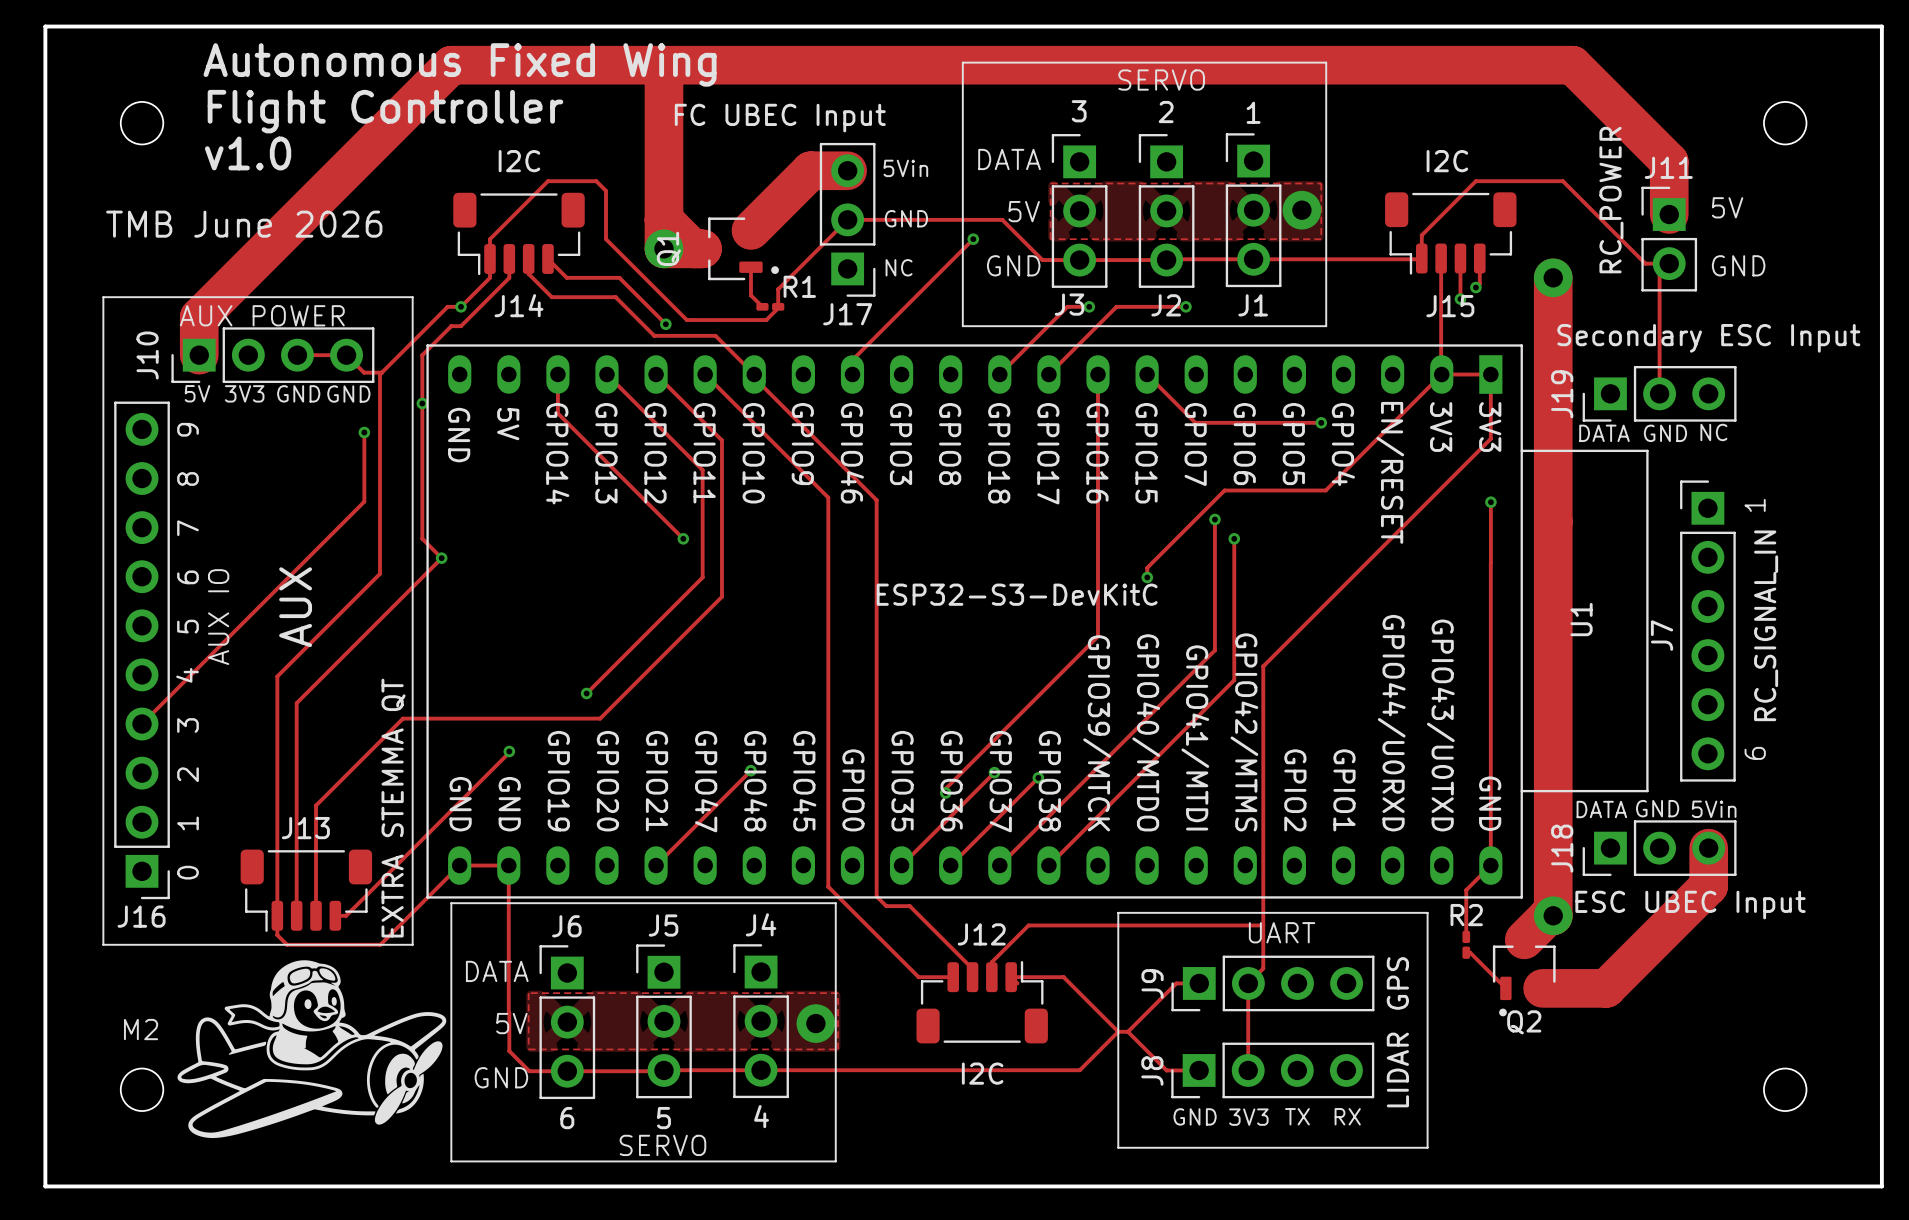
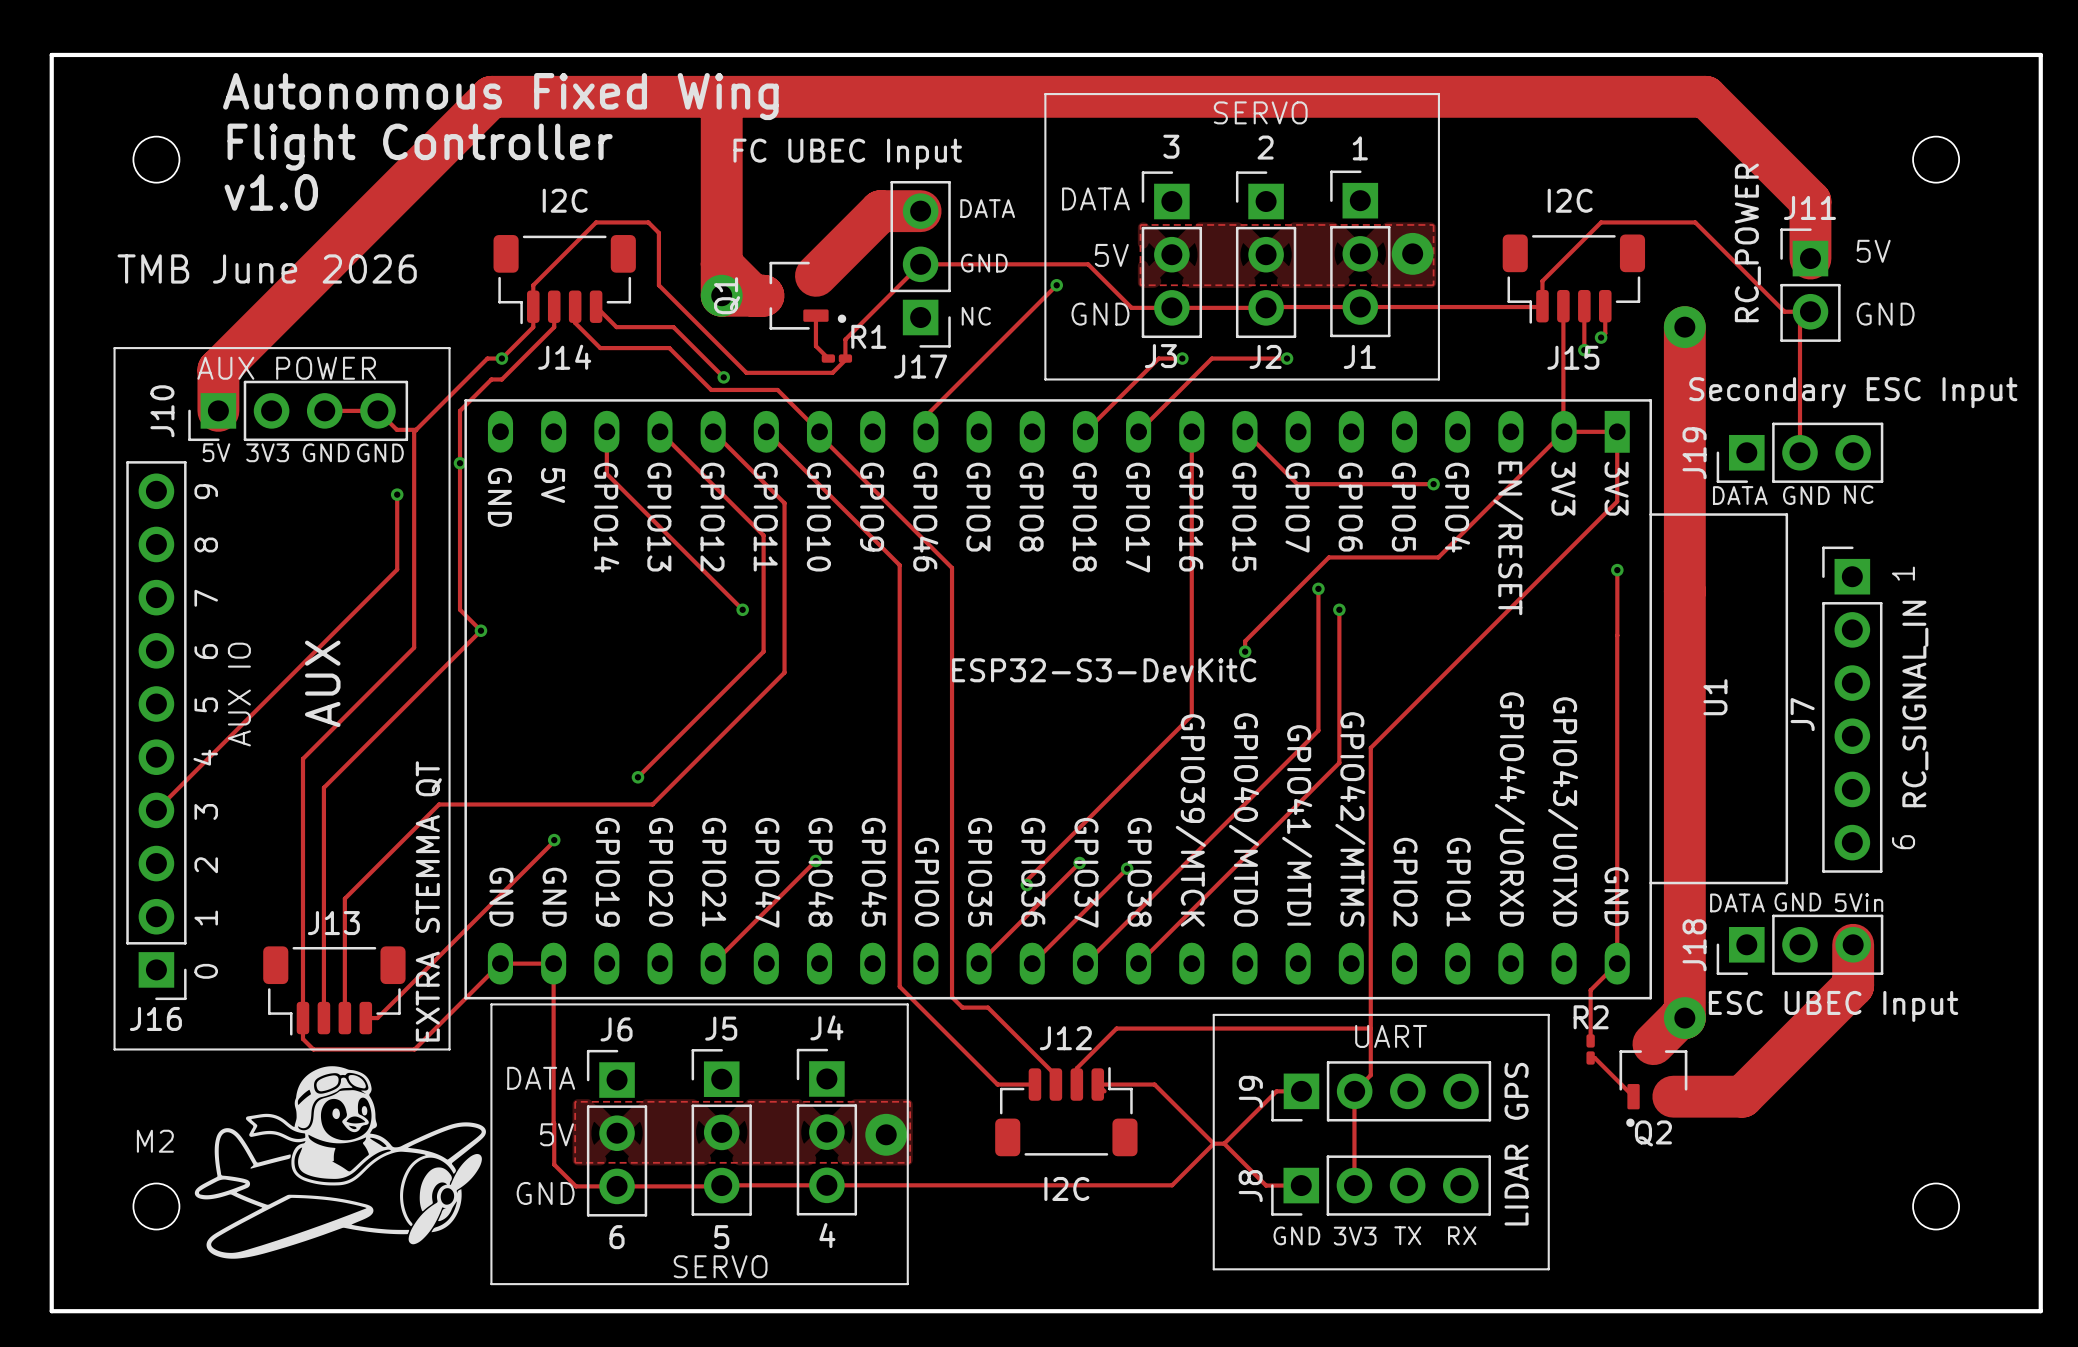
text: 5Vin (905, 168) -> DATA (987, 208)

